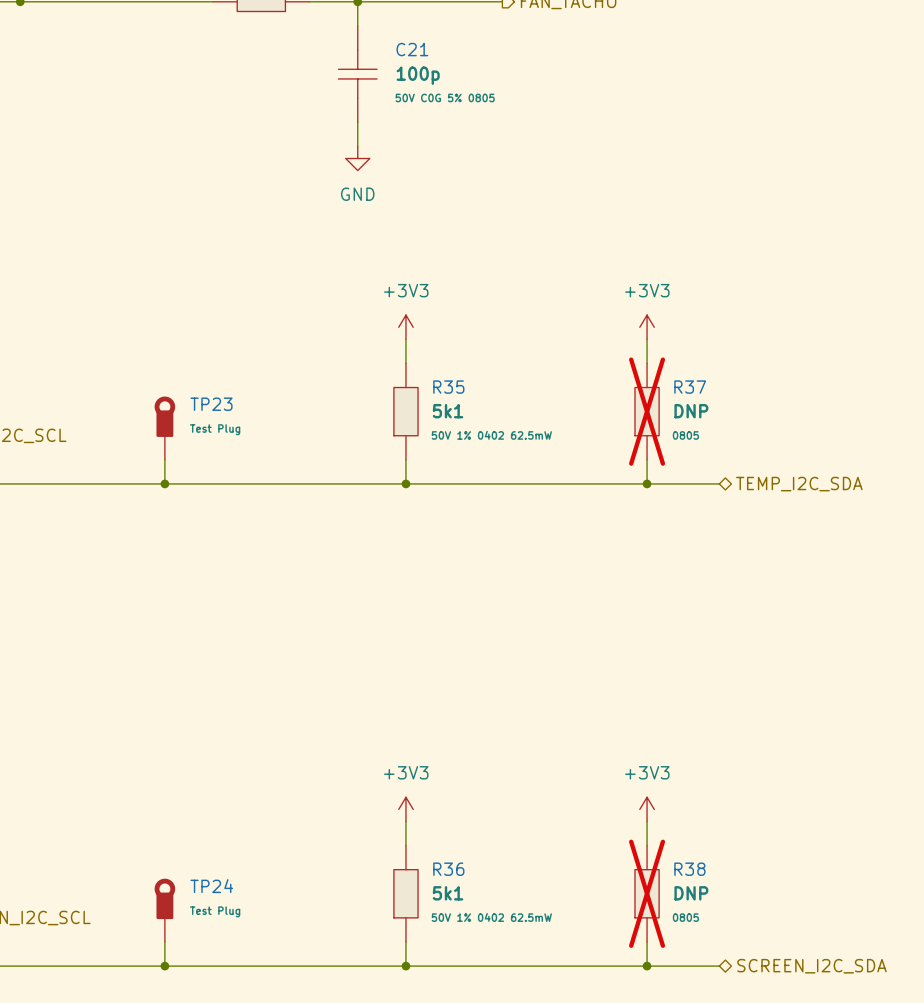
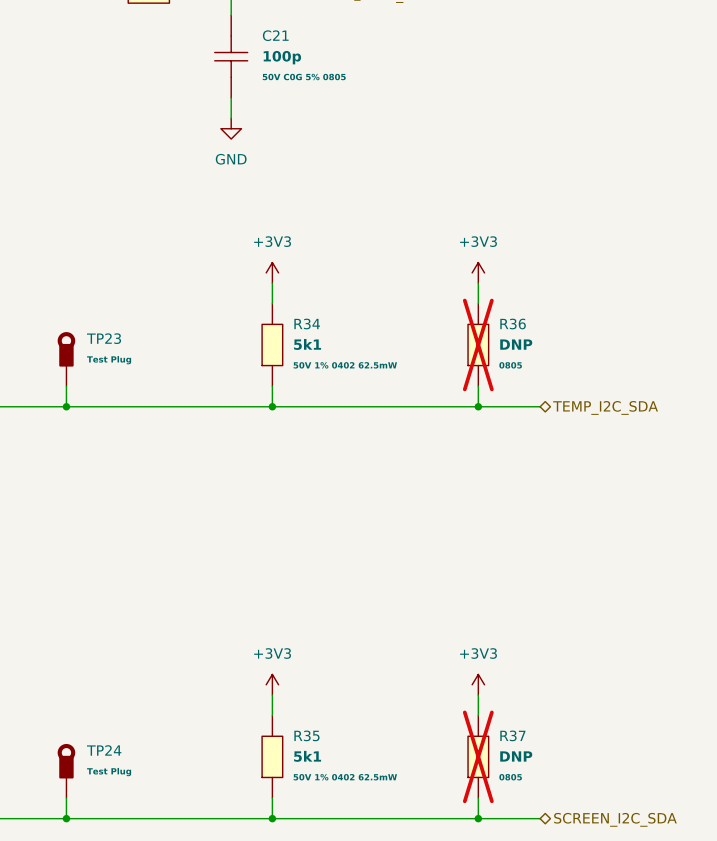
R35 name: R35 (448, 387) -> R34 (307, 324)
R37 name: R37 (690, 387) -> R36 (513, 324)
R36 name: R36 (448, 869) -> R35 (306, 735)
R38 name: R38 (689, 869) -> R37 (512, 735)

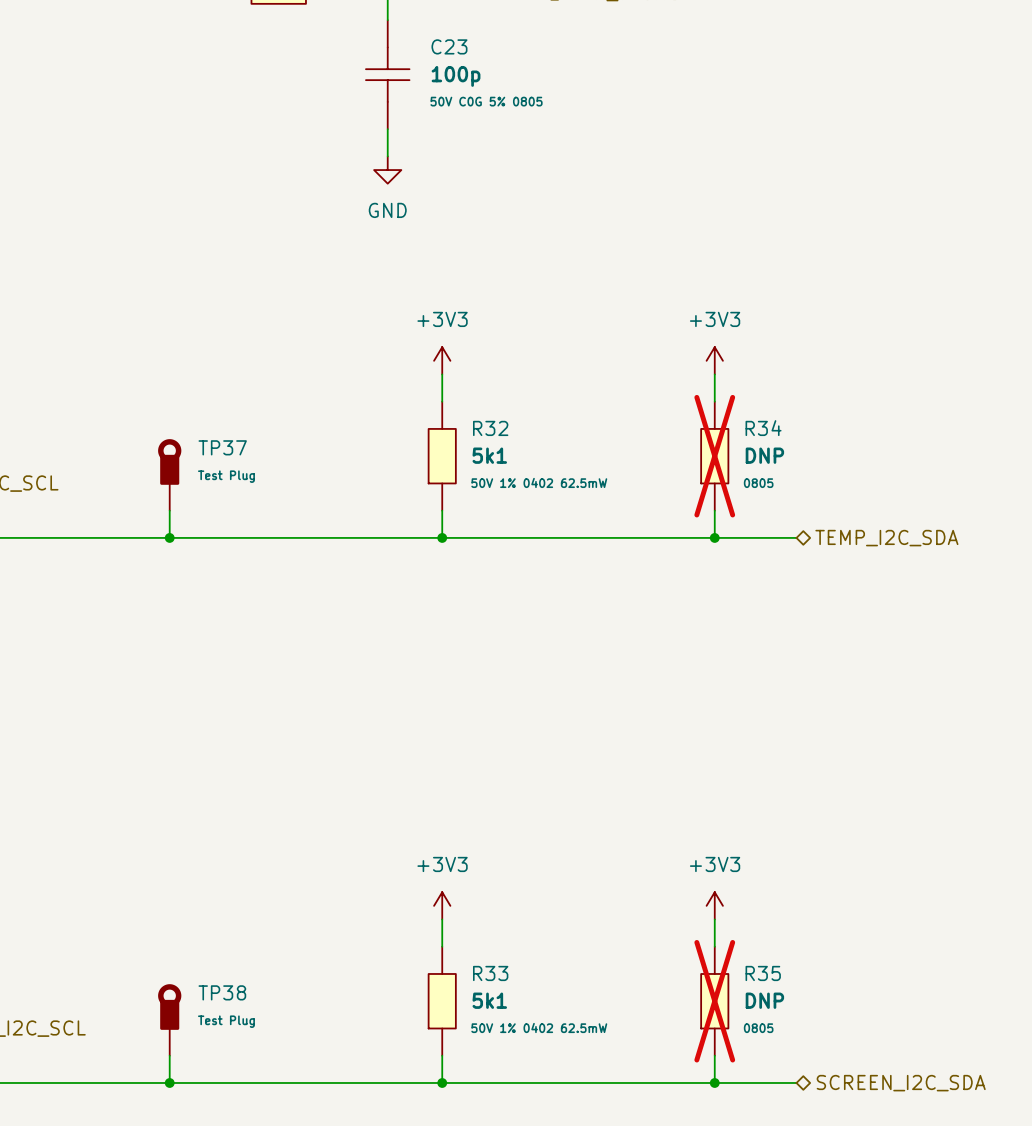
C21 name: C21 (275, 35) -> C23 (449, 46)
R34 name: R34 (307, 324) -> R32 (490, 428)
R36 name: R36 (513, 324) -> R34 (763, 428)
TP23 name: TP23 (104, 338) -> TP37 (222, 447)
R35 name: R35 (306, 735) -> R33 (490, 973)
R37 name: R37 (512, 735) -> R35 (763, 973)
TP24 name: TP24 (104, 750) -> TP38 (222, 992)

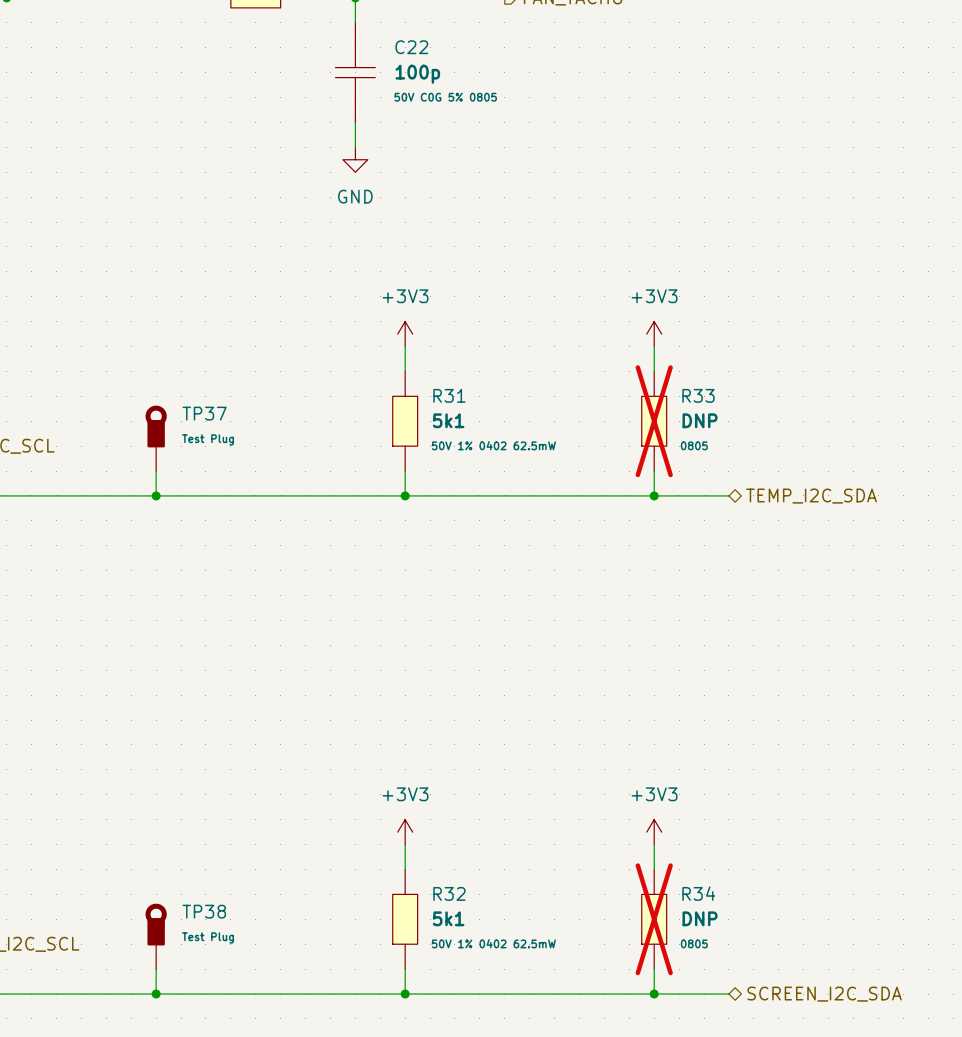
C23 name: C23 (449, 46) -> C22 (411, 47)
R32 name: R32 (490, 428) -> R31 (449, 395)
R34 name: R34 (763, 428) -> R33 (698, 395)
R33 name: R33 (490, 973) -> R32 (449, 893)
R35 name: R35 (763, 973) -> R34 (698, 893)

